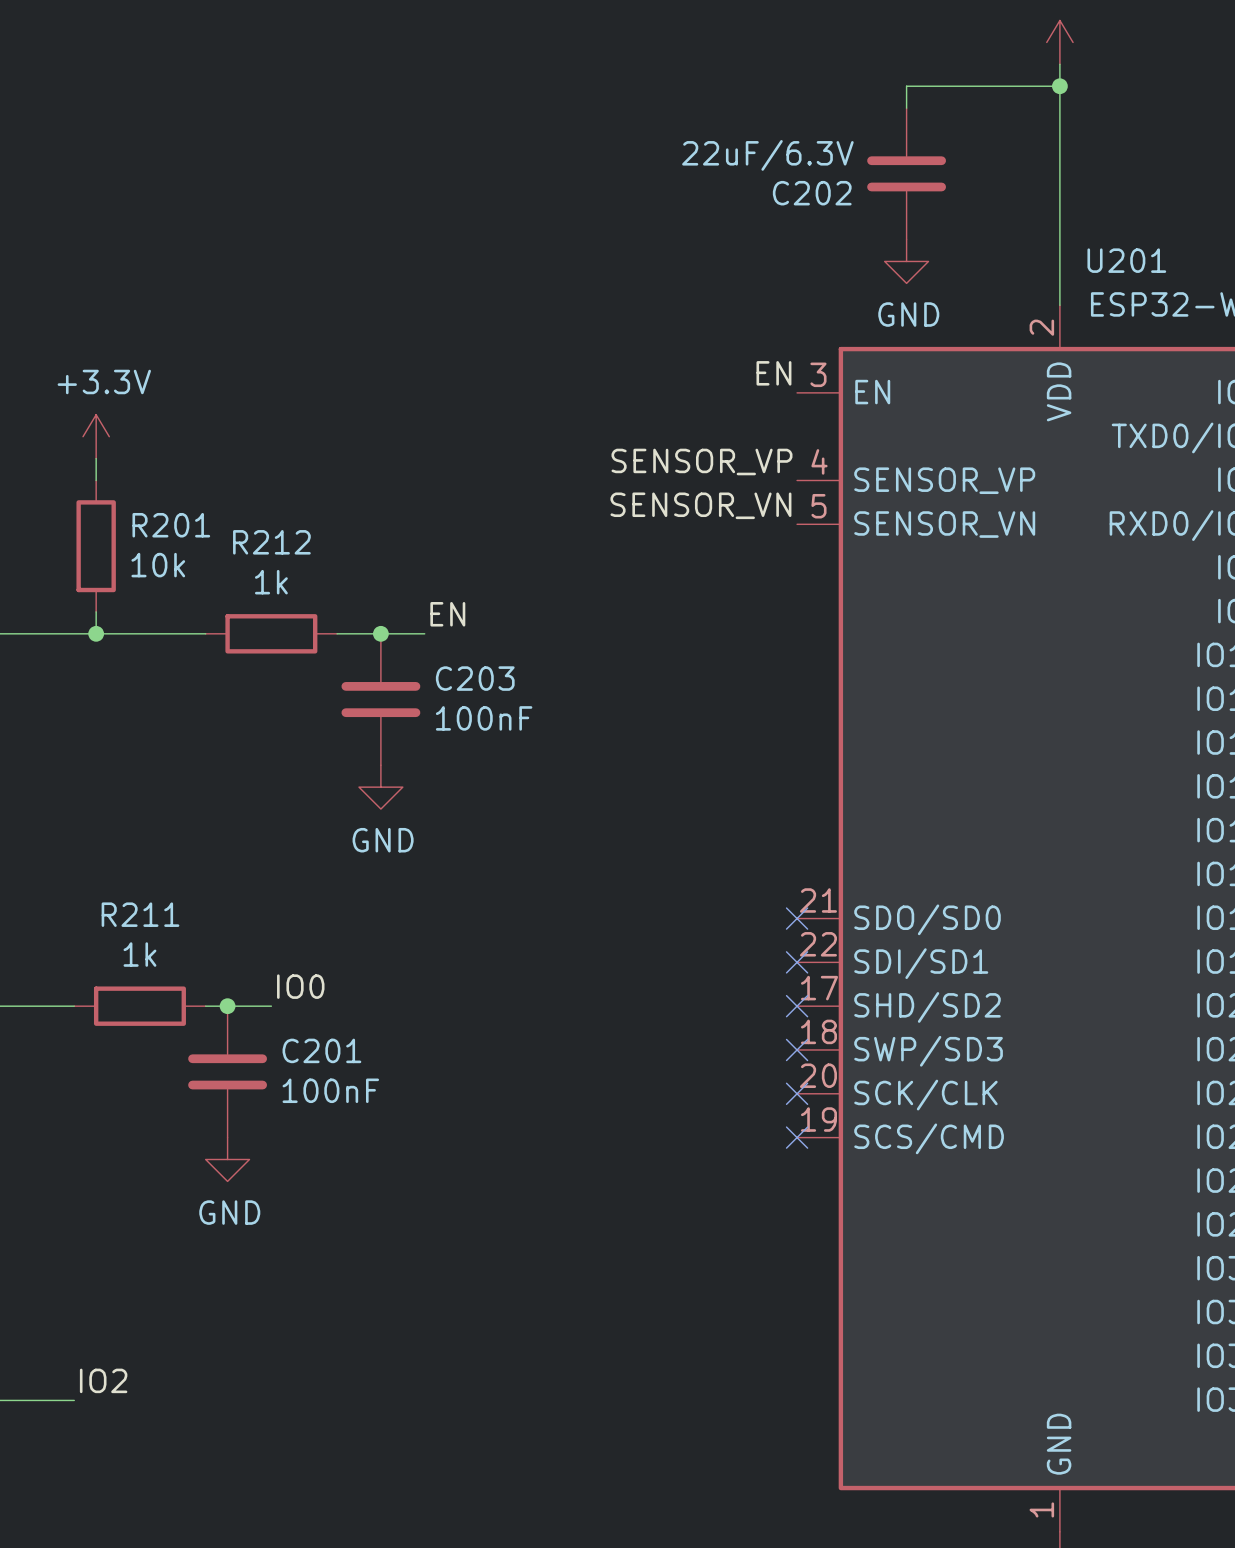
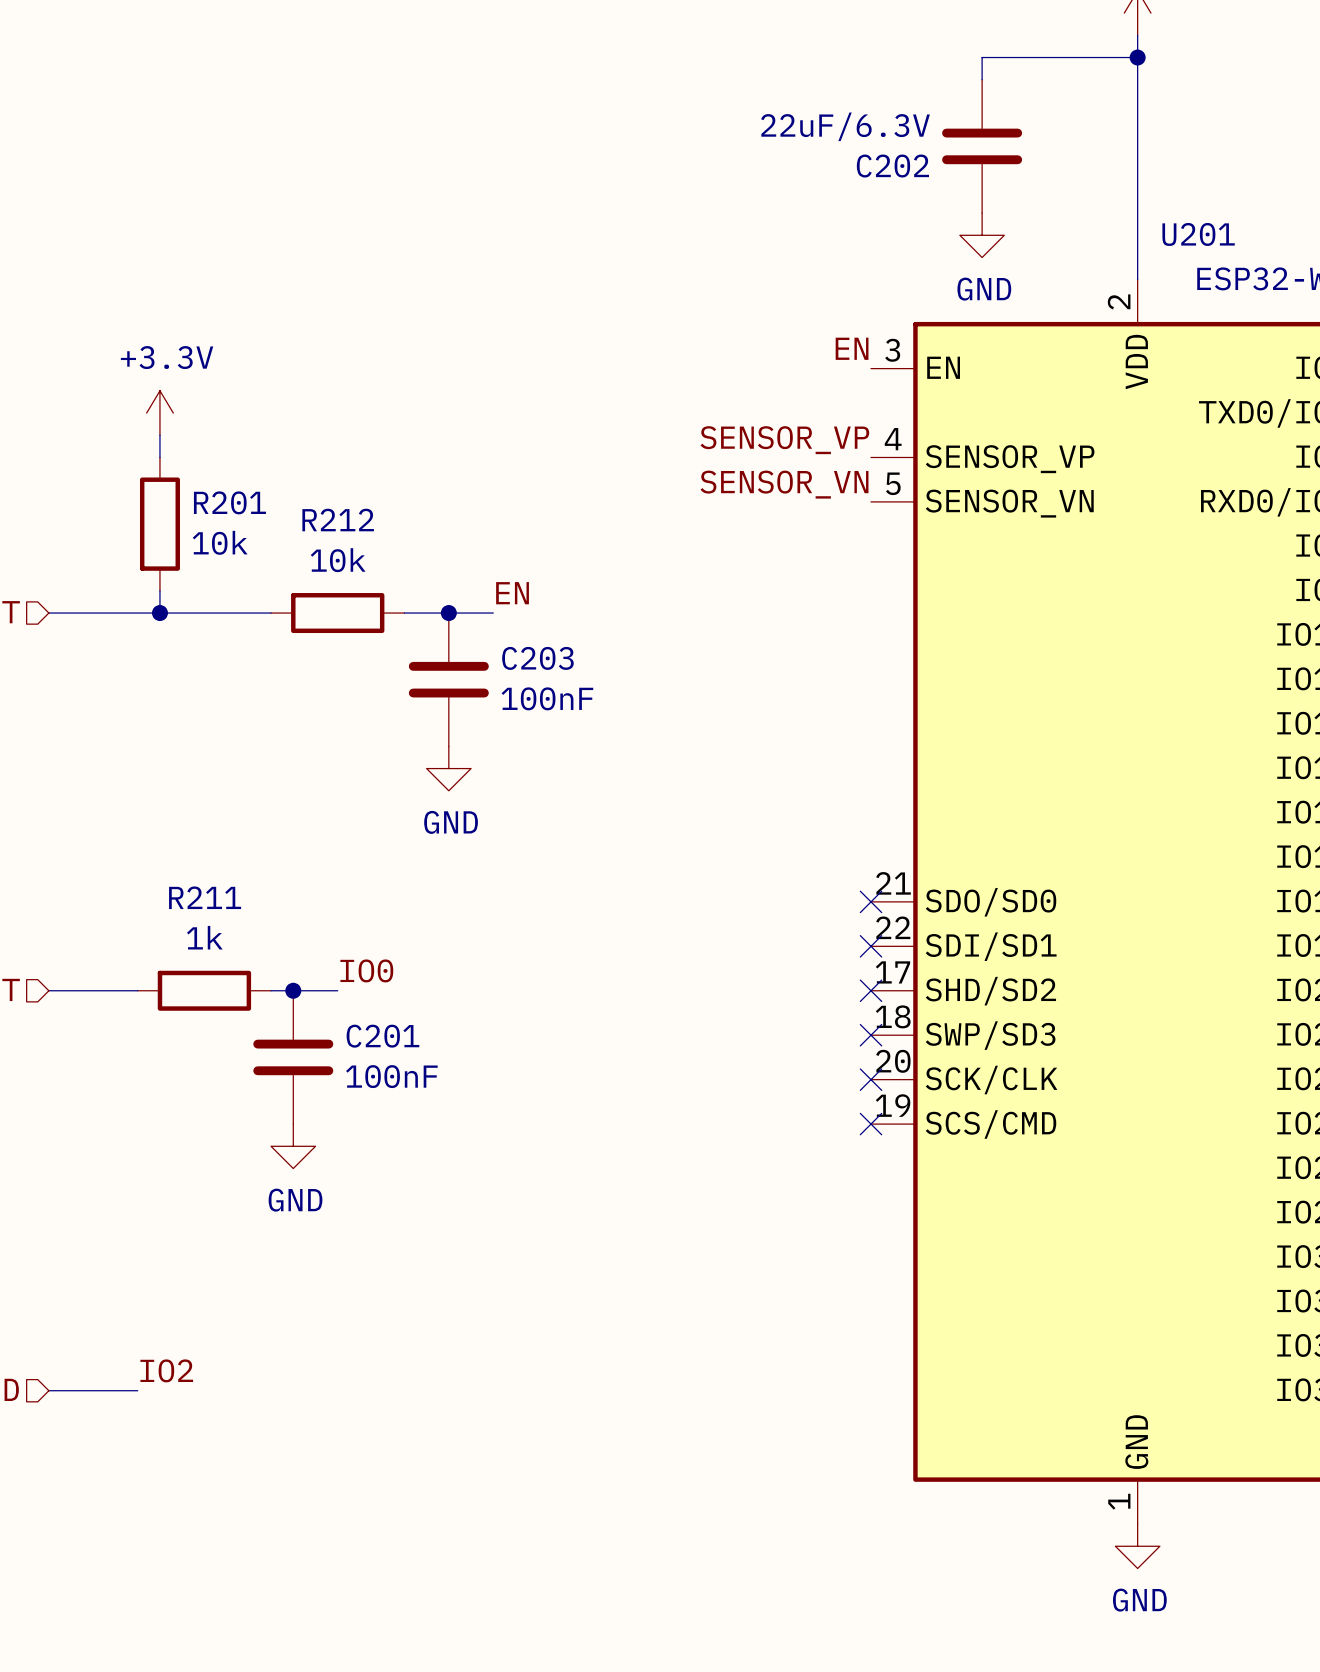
R212 value: 1k (271, 582) -> 10k (338, 560)

